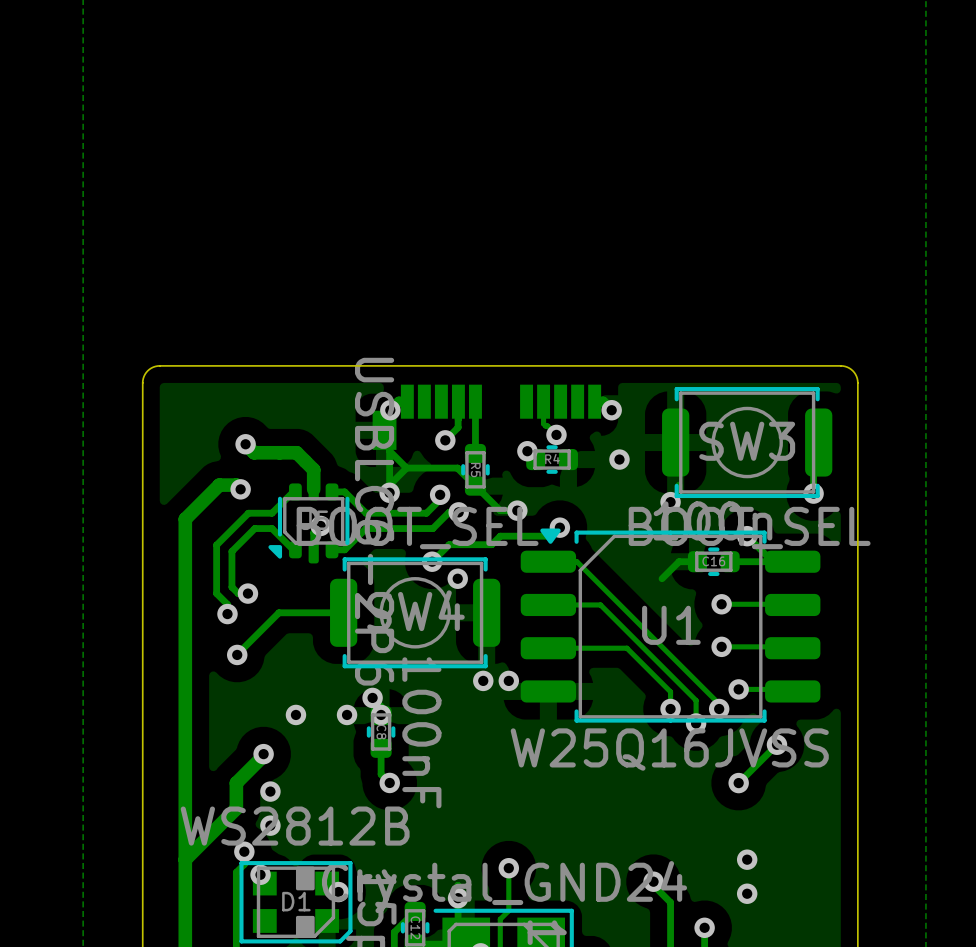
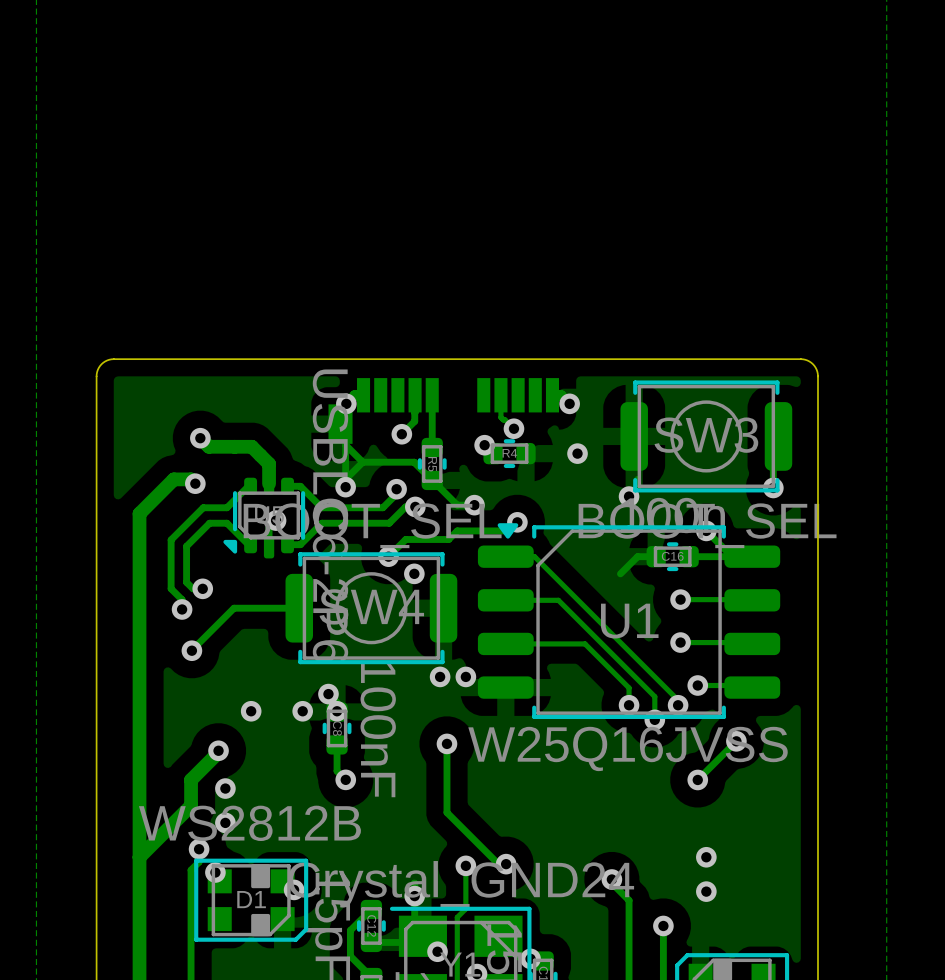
track: none -> (446, 743) (446, 812) (498, 864) (506, 864)
via: none -> (446, 743)
via: none -> (506, 864)

